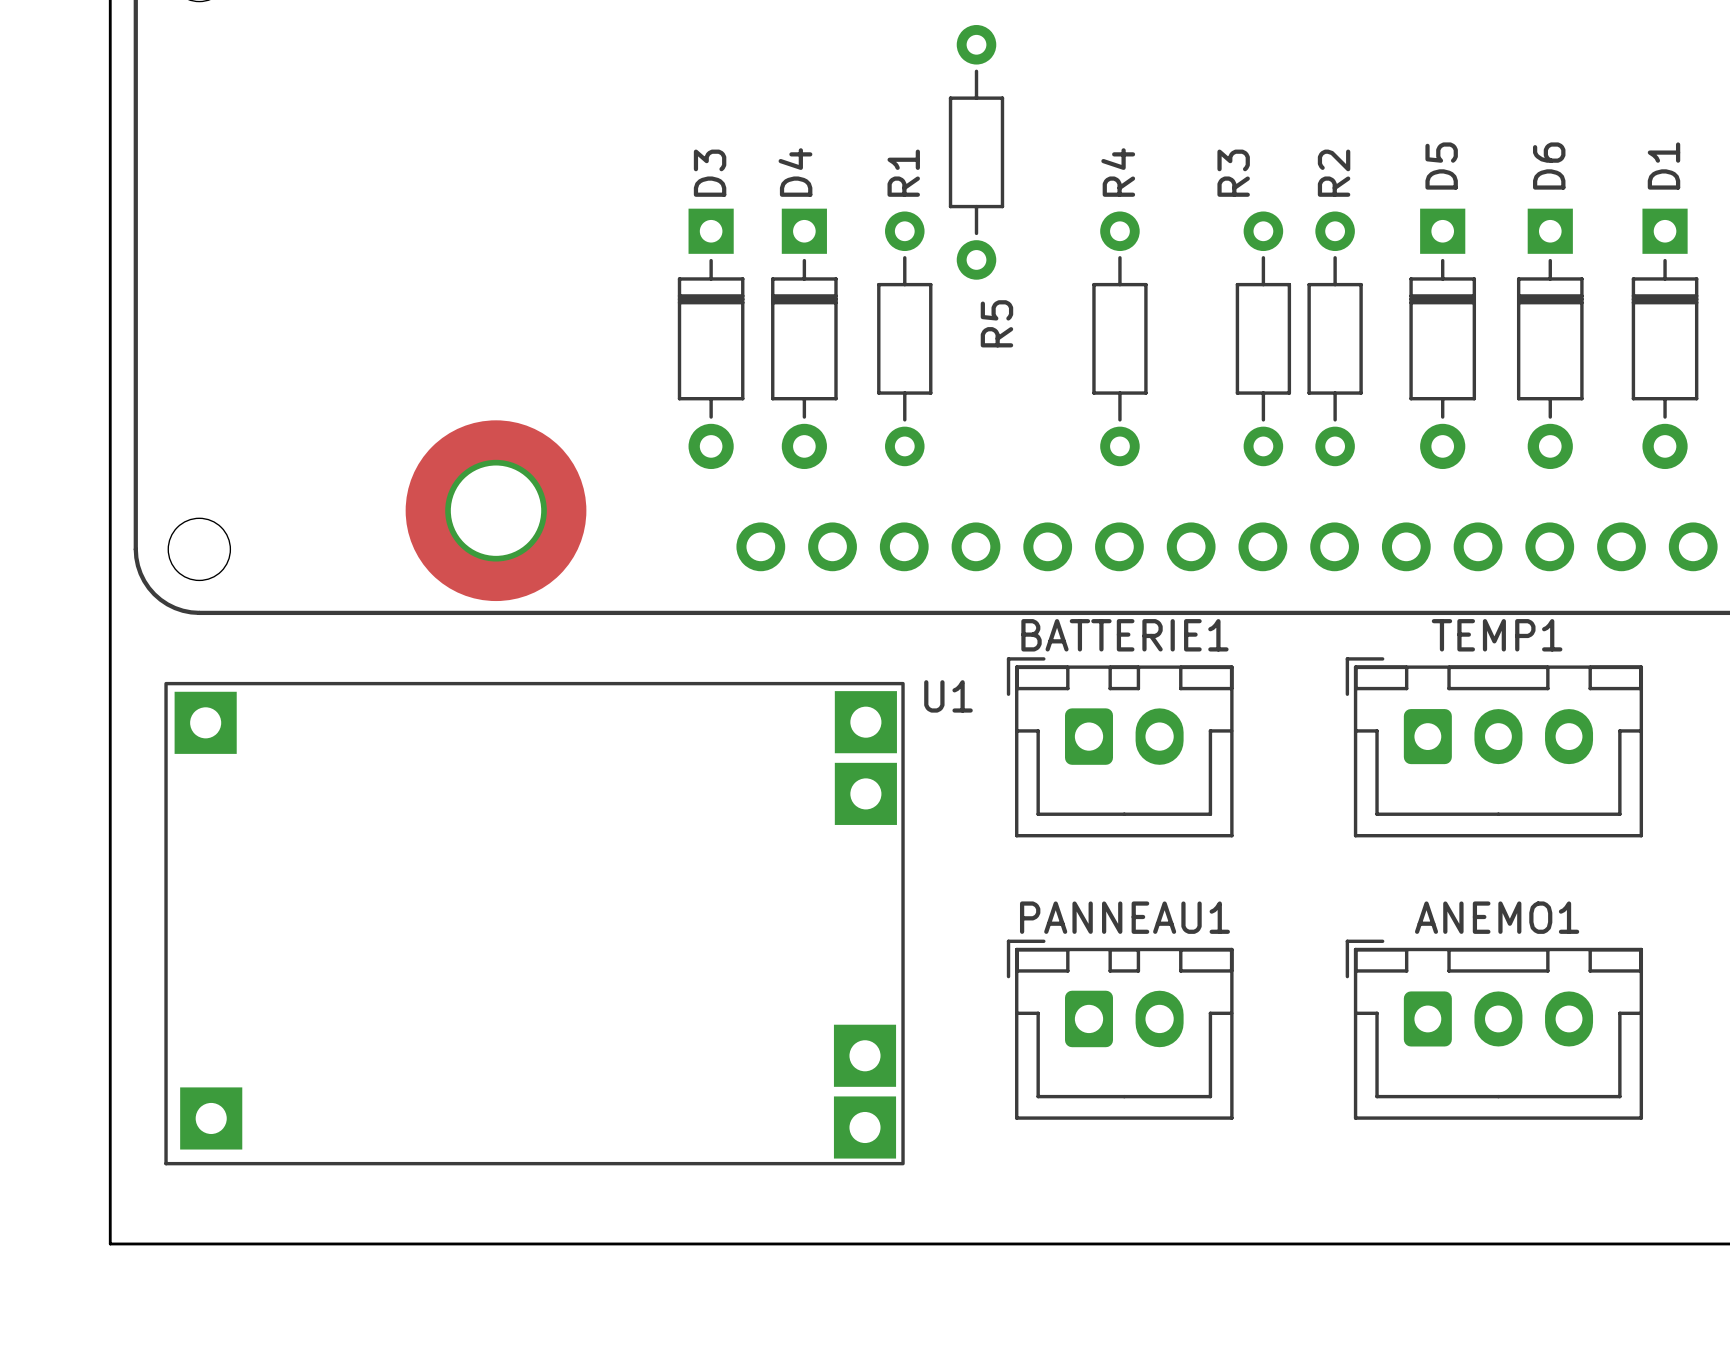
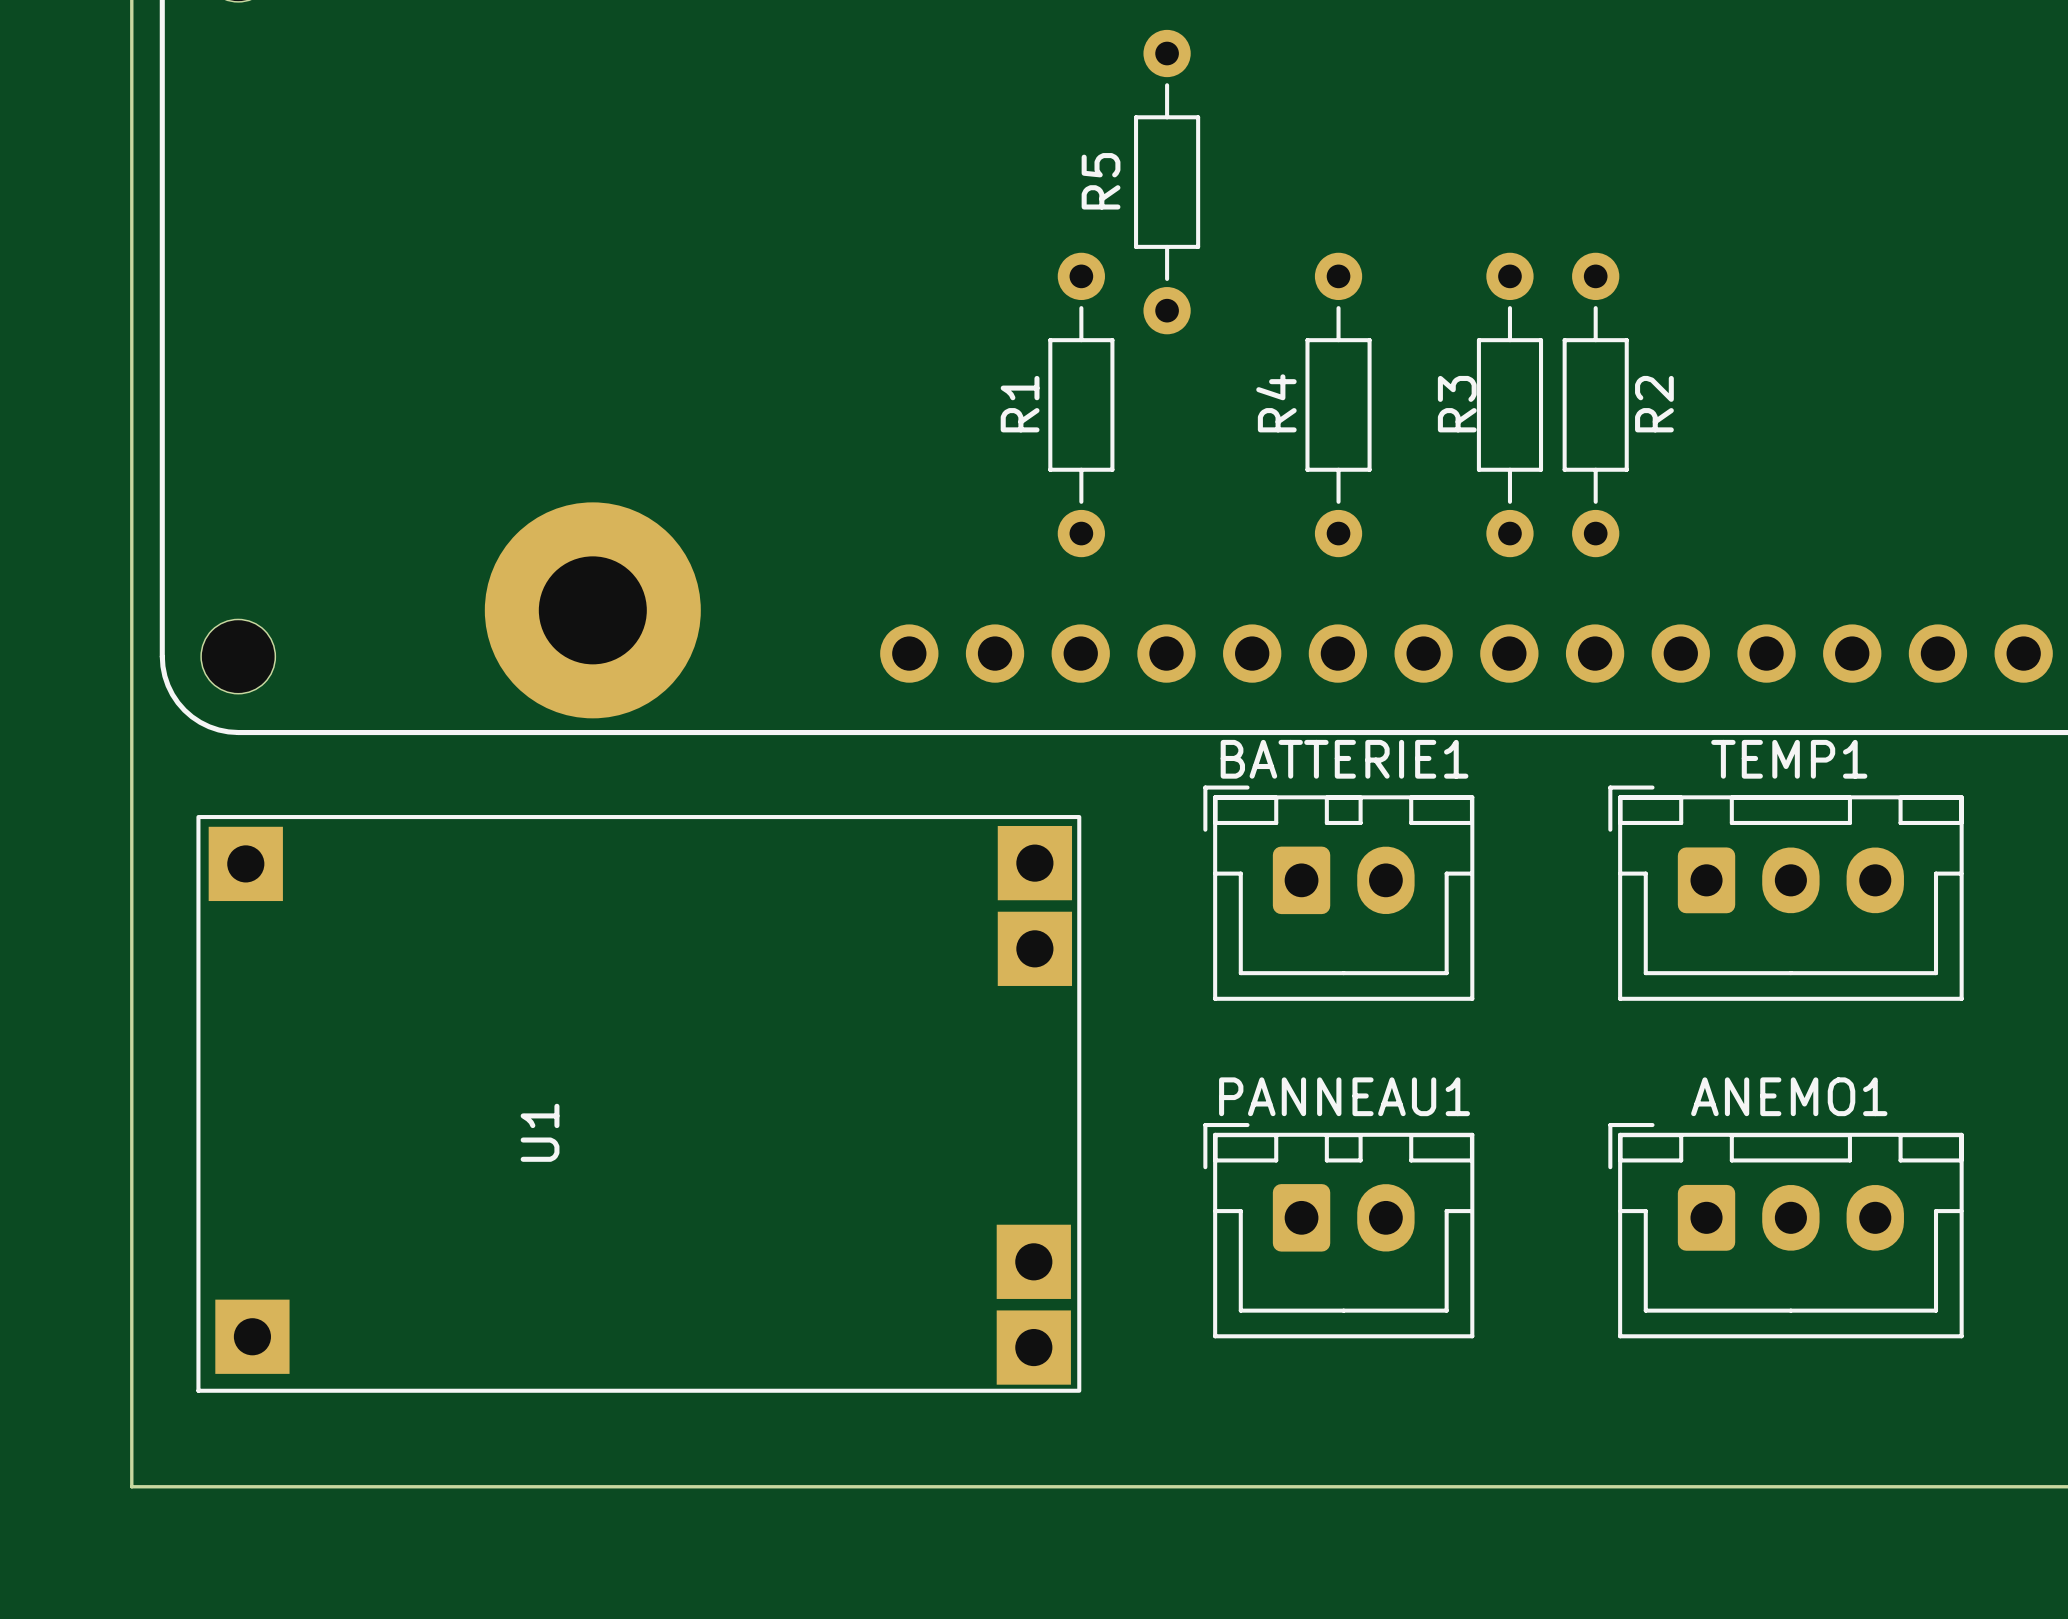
R4 name position: R4 (1118, 172) -> R4 (1276, 403)
R1 name position: R1 (903, 173) -> R1 (1020, 404)
R3 name position: R3 (1233, 173) -> R3 (1457, 404)
R2 name position: R2 (1334, 173) -> R2 (1654, 404)
R5 name position: R5 (996, 323) -> R5 (1101, 181)
D3: (711, 338) -> none
D4: (804, 338) -> none
D5: (1442, 338) -> none
D6: (1550, 338) -> none
D1: (1665, 338) -> none
U1 name rotation: 0° (948, 696) -> 90° counterclockwise (540, 1132)
U1 name position: U1 (948, 696) -> U1 (540, 1132)

